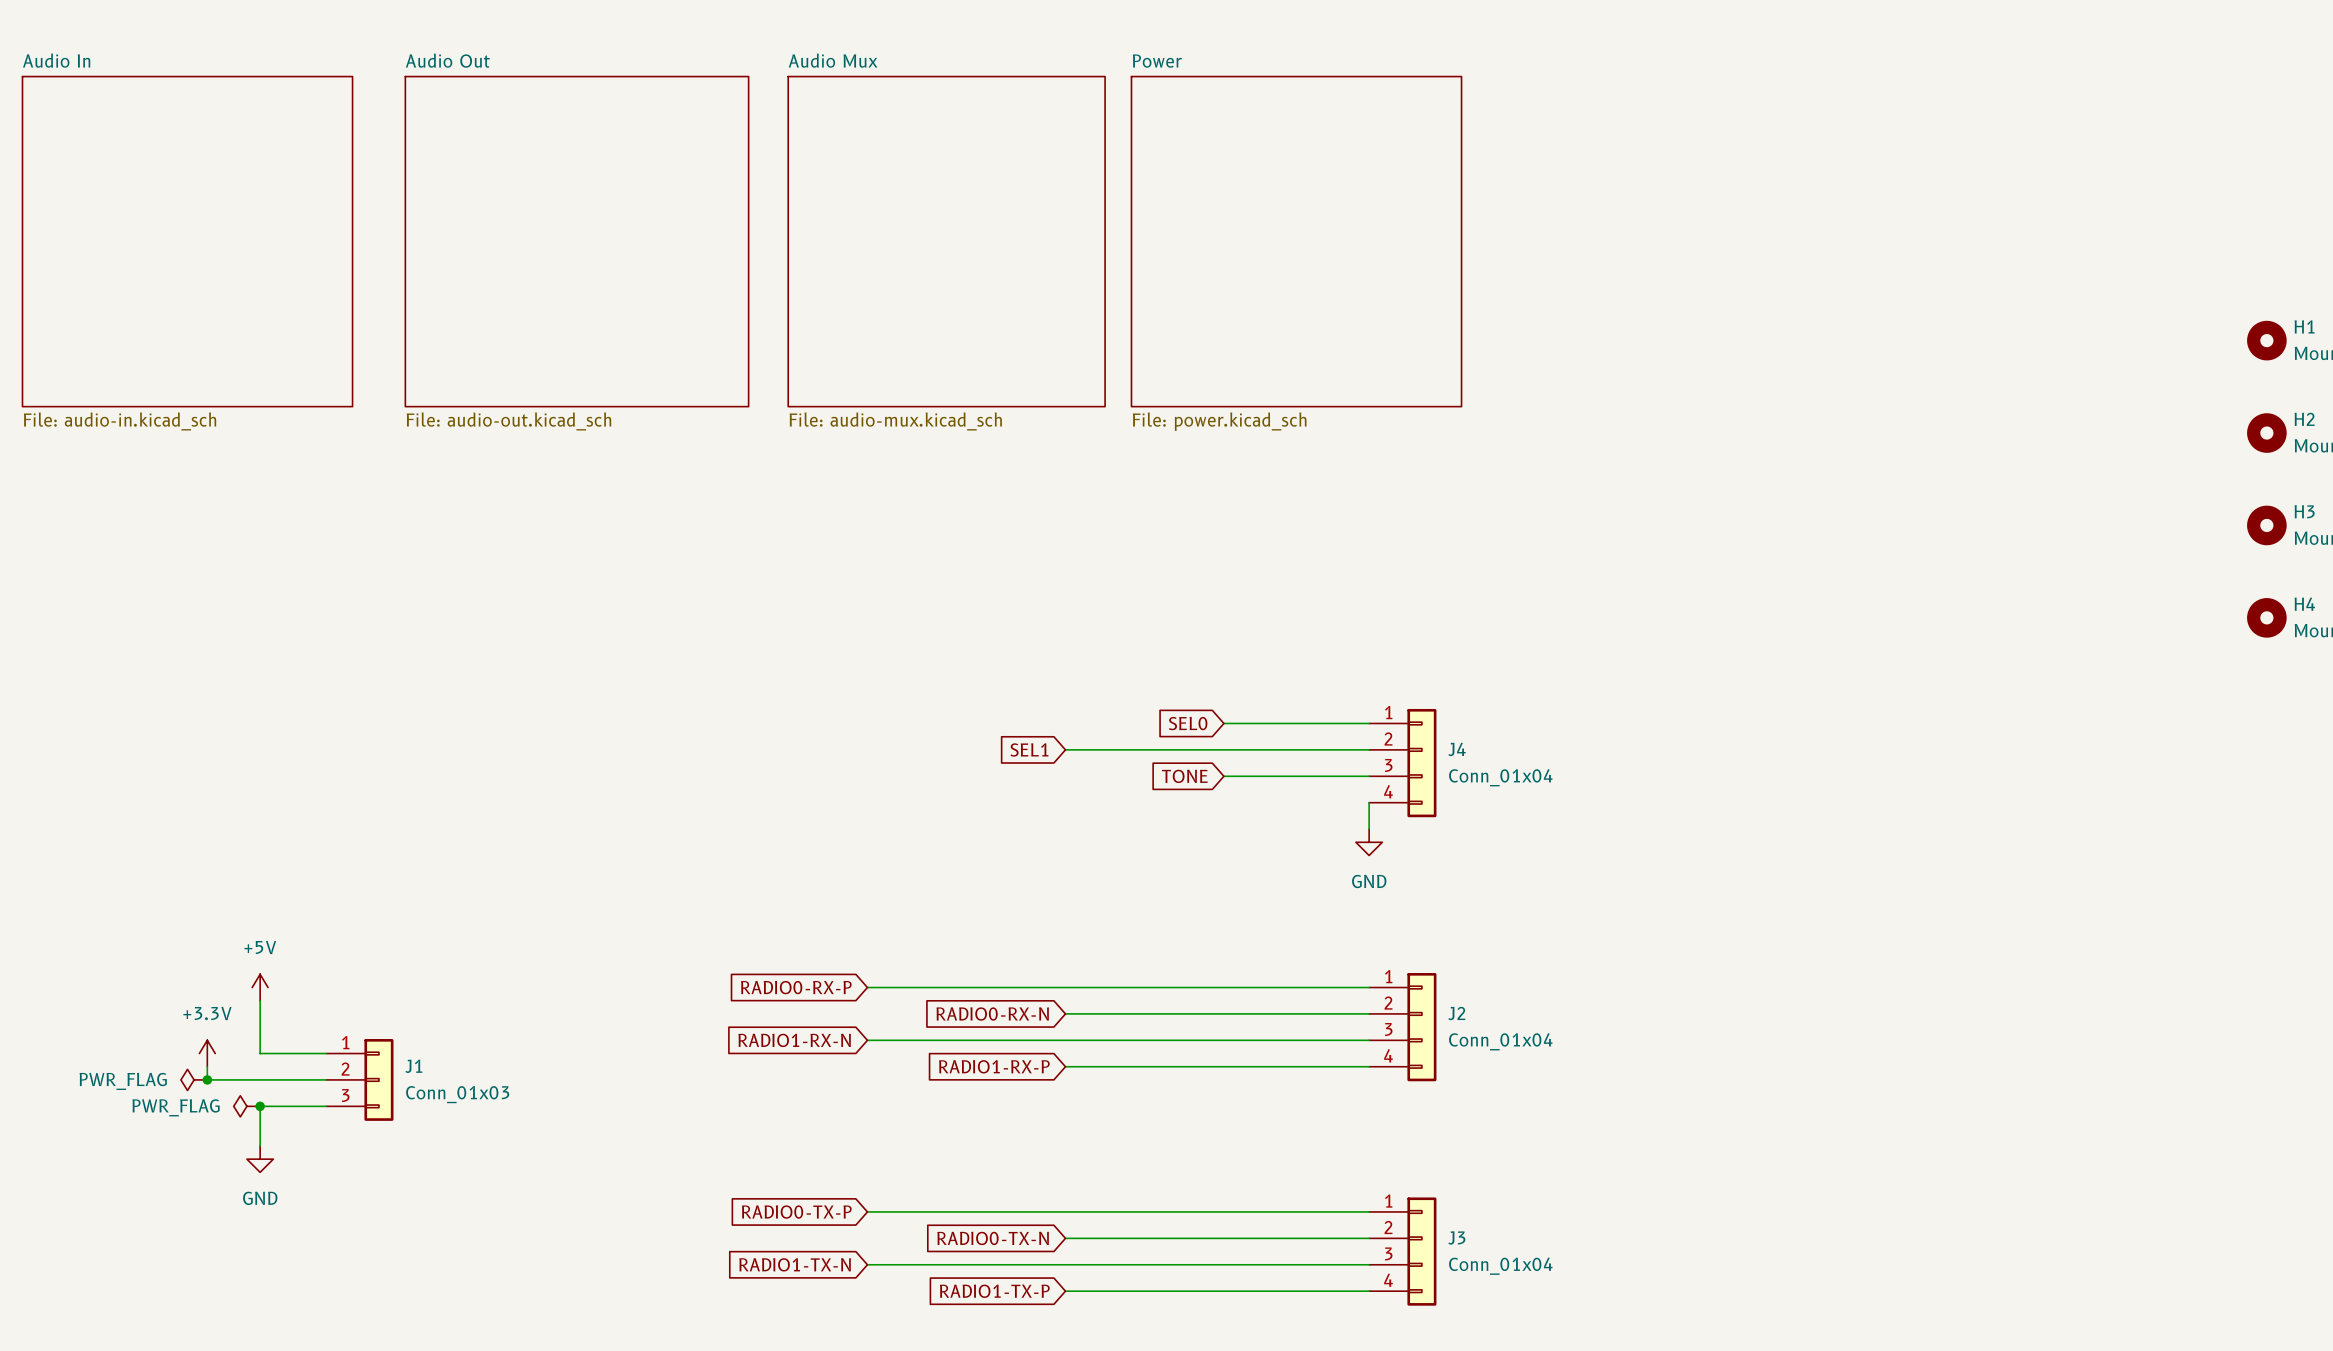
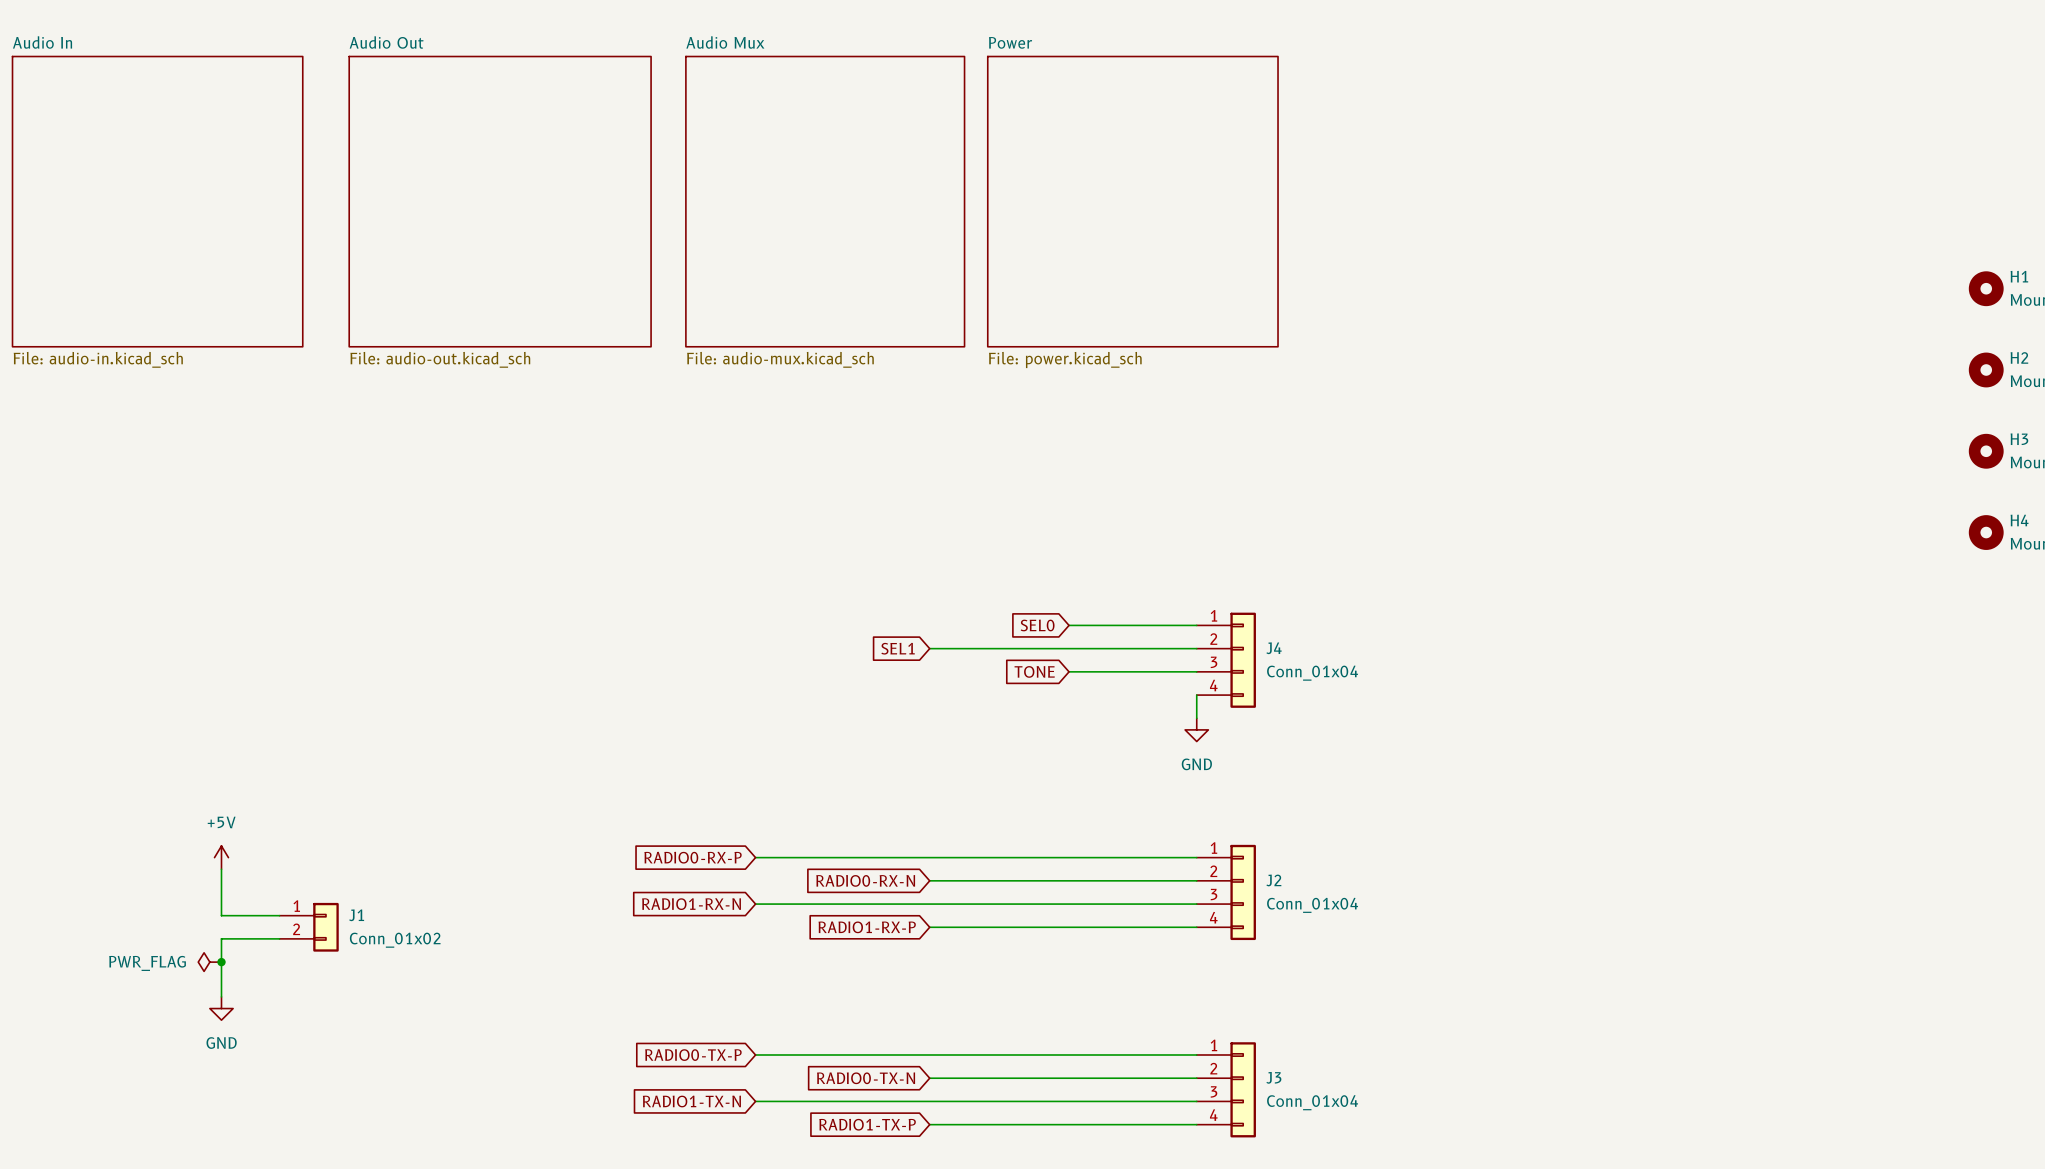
J1 symbol: [326, 1039, 394, 1121] -> [279, 902, 339, 952]
power symbol: +3.3V (207, 1053) -> none
wire: (207, 1066) (207, 1079) (260, 1079) -> (221, 962) (221, 938)
power symbol: PWR_FLAG (194, 1079) -> none
junction: (207, 1079) -> none
J1 value: Conn_01x03 (457, 1094) -> Conn_01x02 (395, 940)
wire: (260, 1106) (326, 1106) -> none

